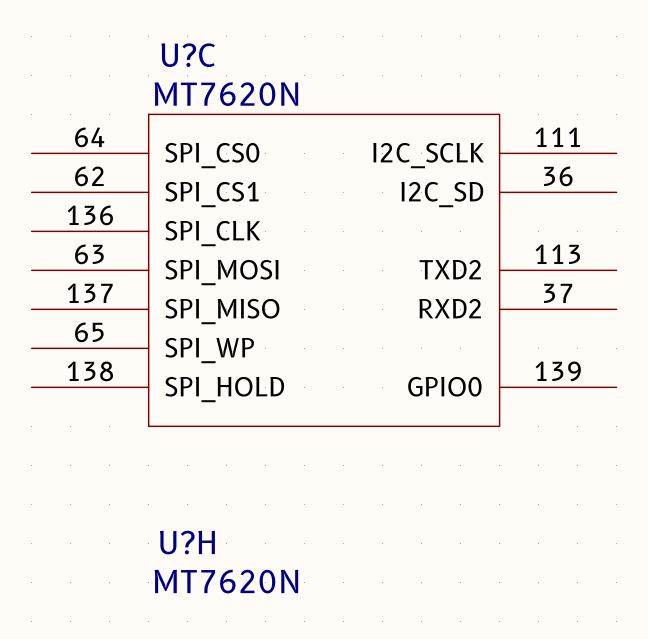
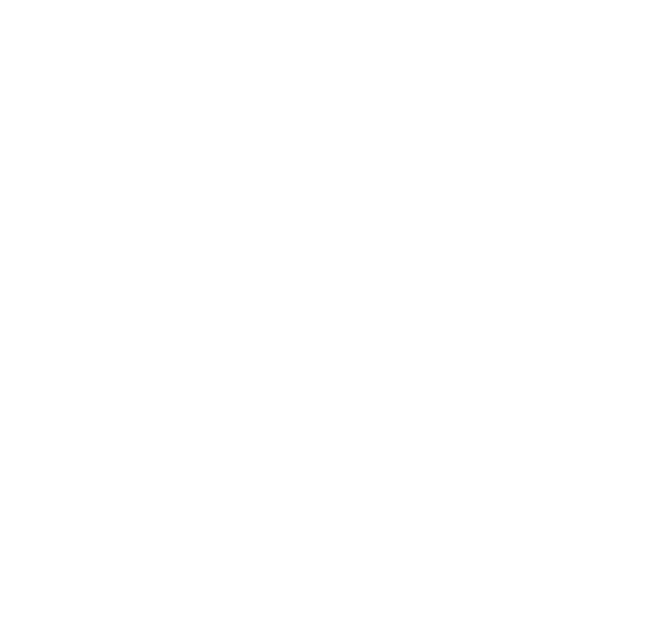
U?C: MT7620N (324, 270) -> none
U?H: MT7620N (226, 562) -> none

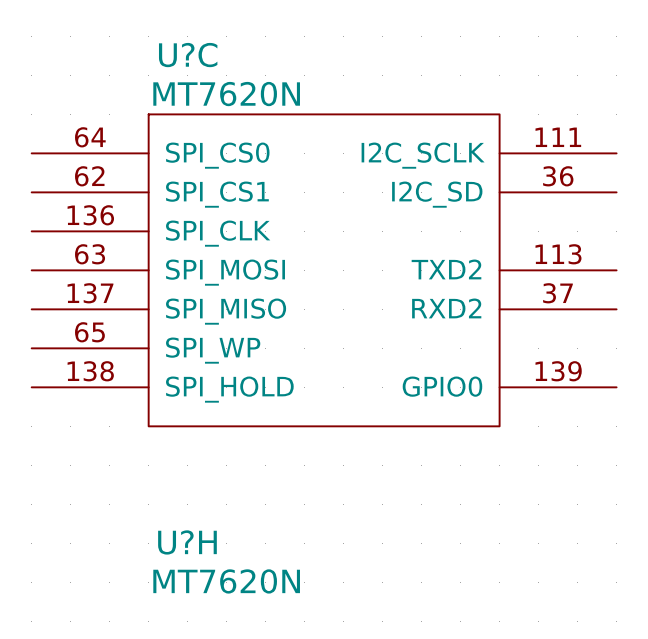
U?C: none -> MT7620N (324, 270)
U?H: none -> MT7620N (226, 561)

